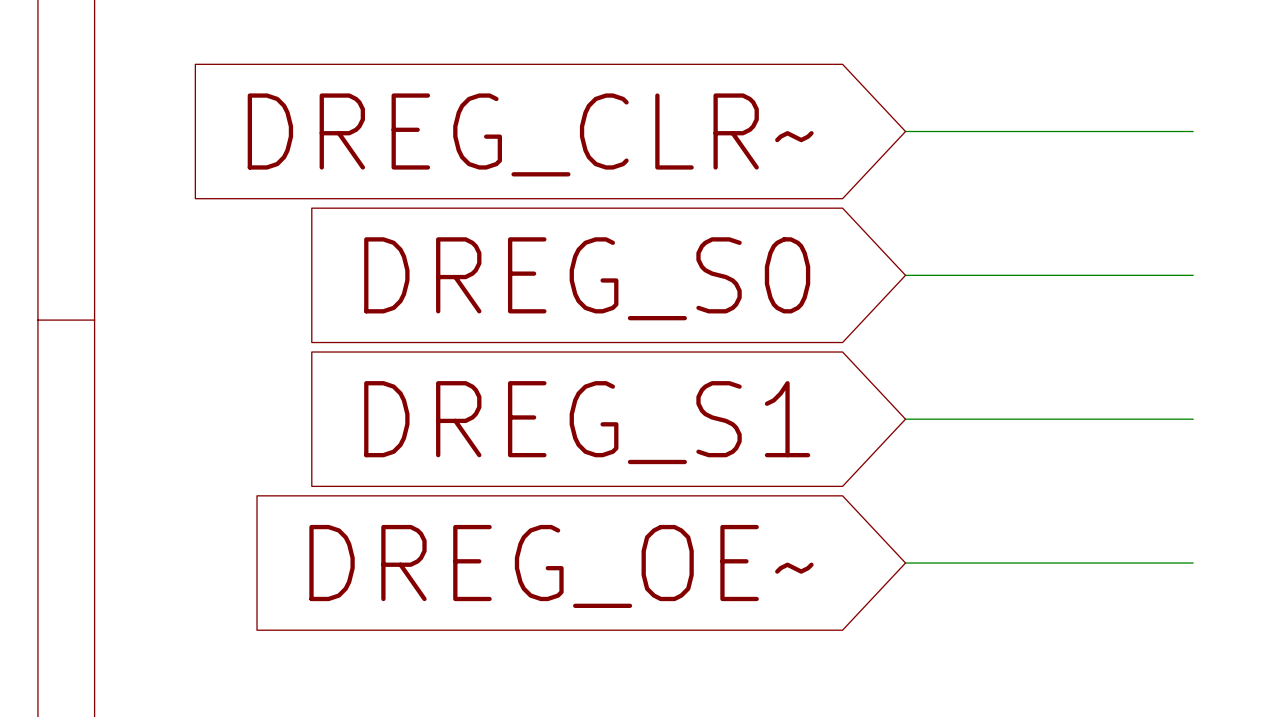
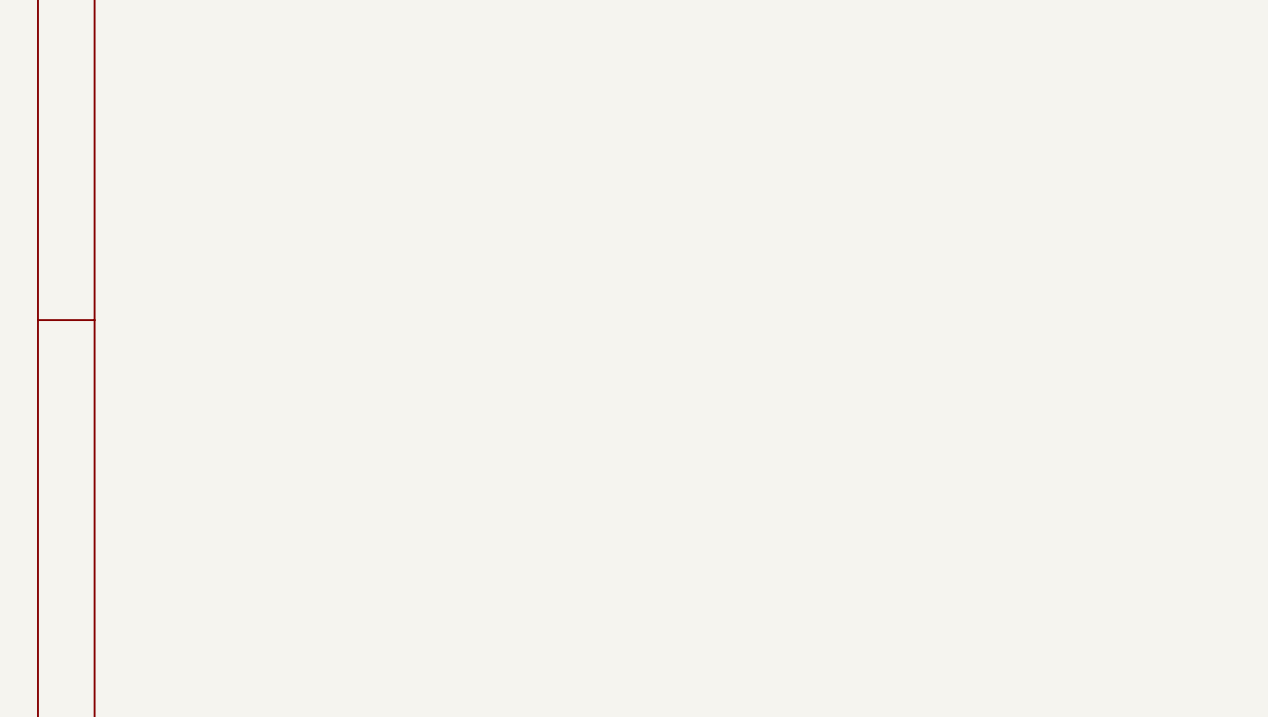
wire: (905, 131) (1193, 131) -> none
global label: DREG_CLR~ (530, 134) -> none
wire: (905, 275) (1193, 275) -> none
global label: DREG_S0 (587, 278) -> none
wire: (905, 419) (1193, 419) -> none
global label: DREG_S1 (587, 422) -> none
wire: (905, 563) (1193, 563) -> none
global label: DREG_OE~ (561, 566) -> none

